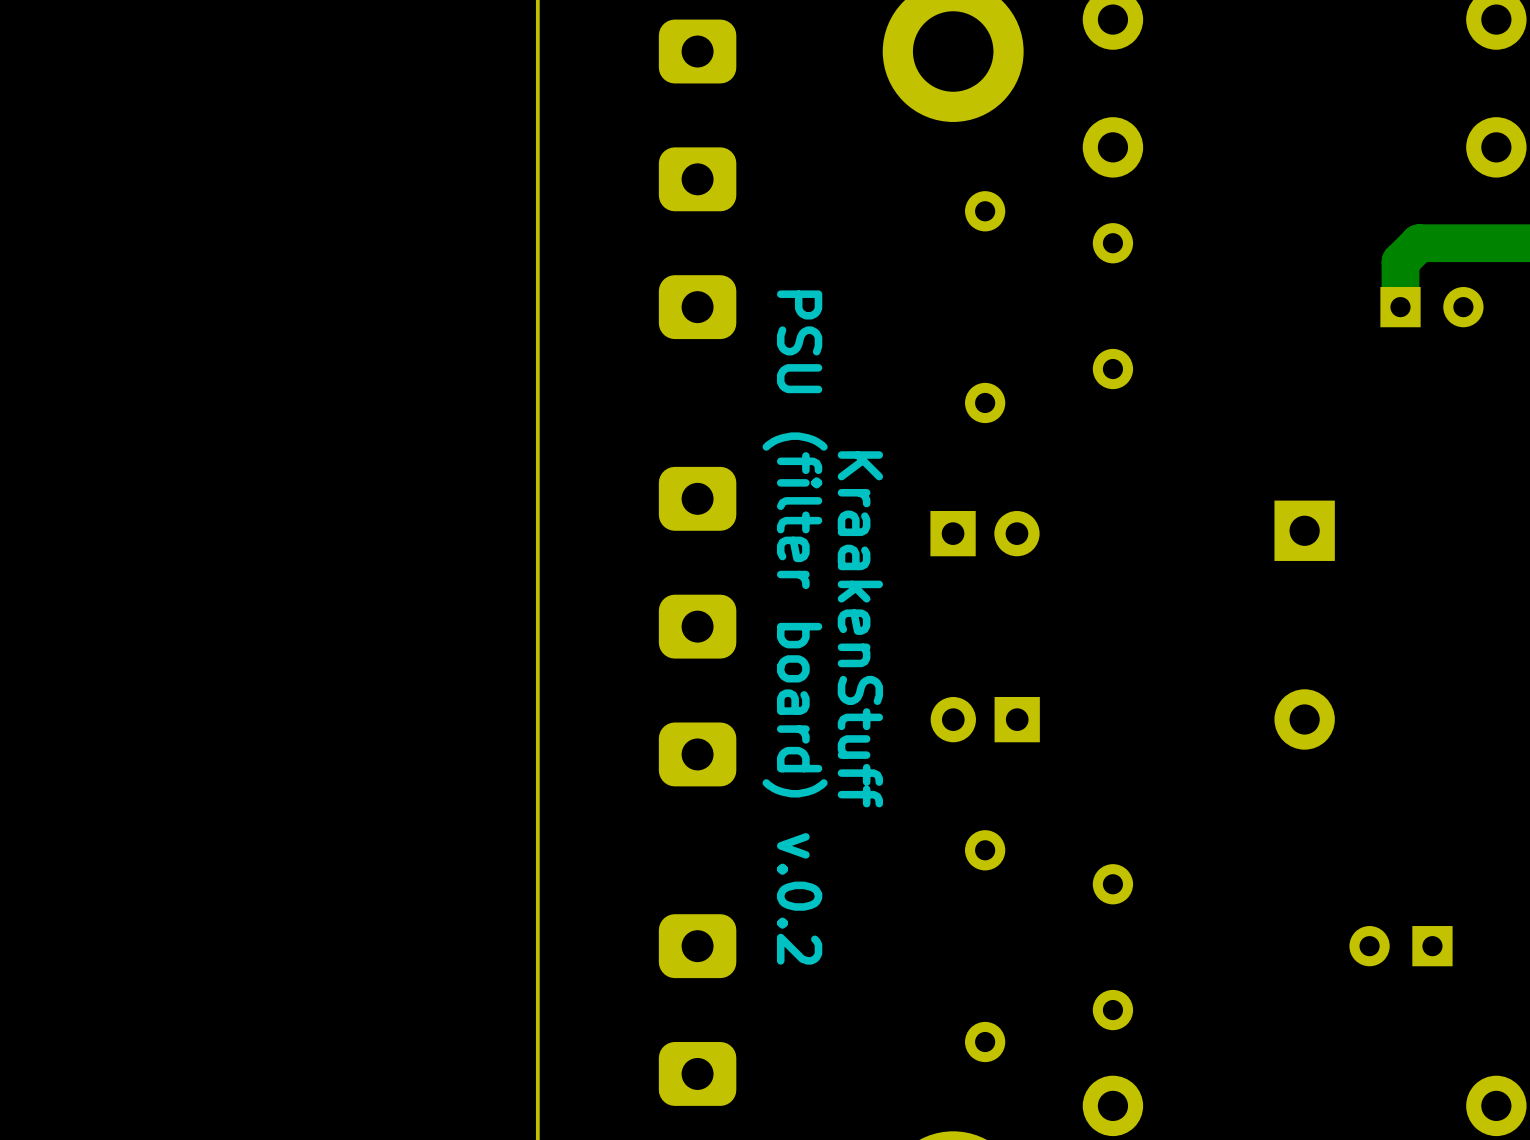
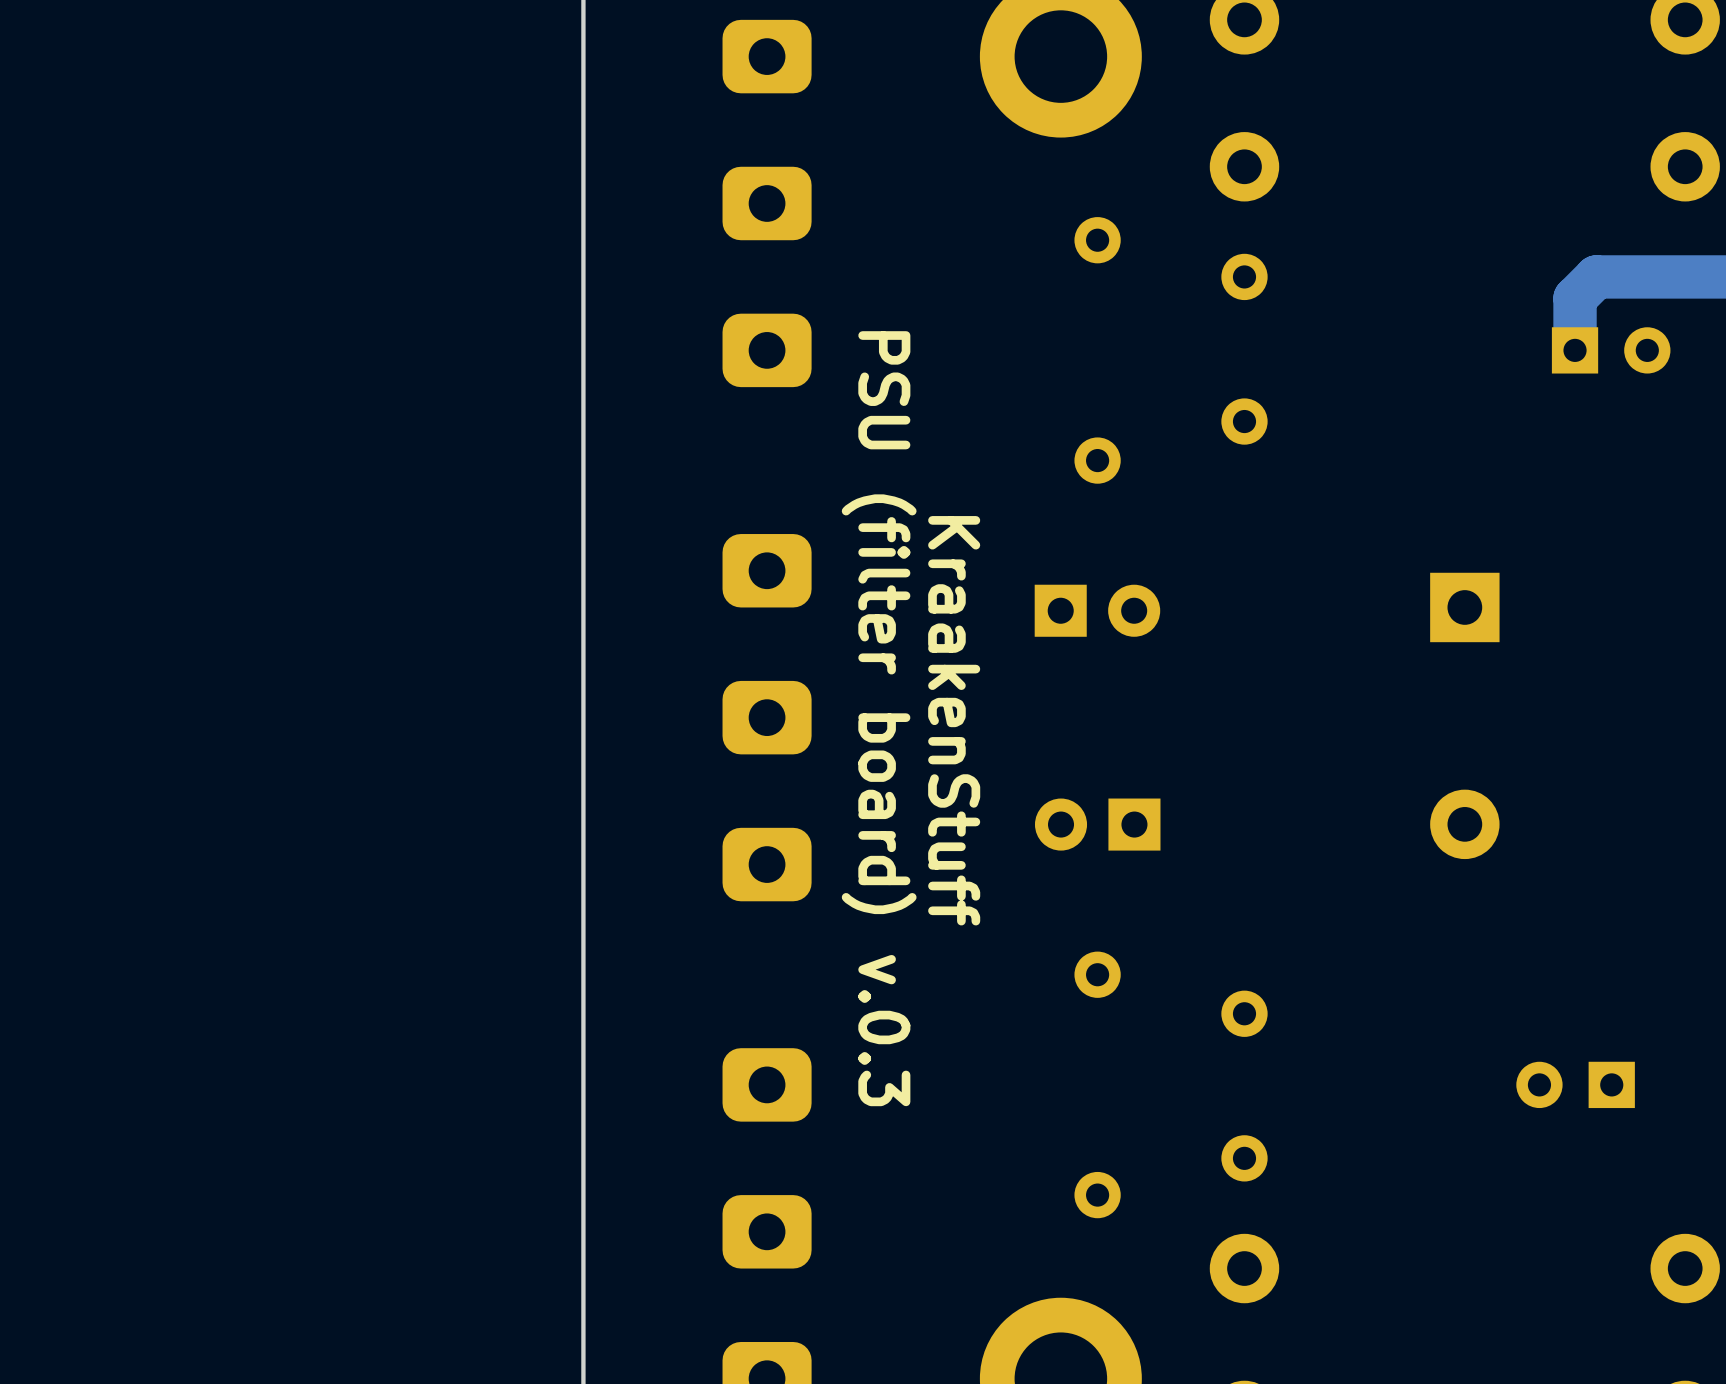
text: PSU (filter board) v.0.2 (795, 627) -> PSU (filter board) v.0.3 (879, 718)

